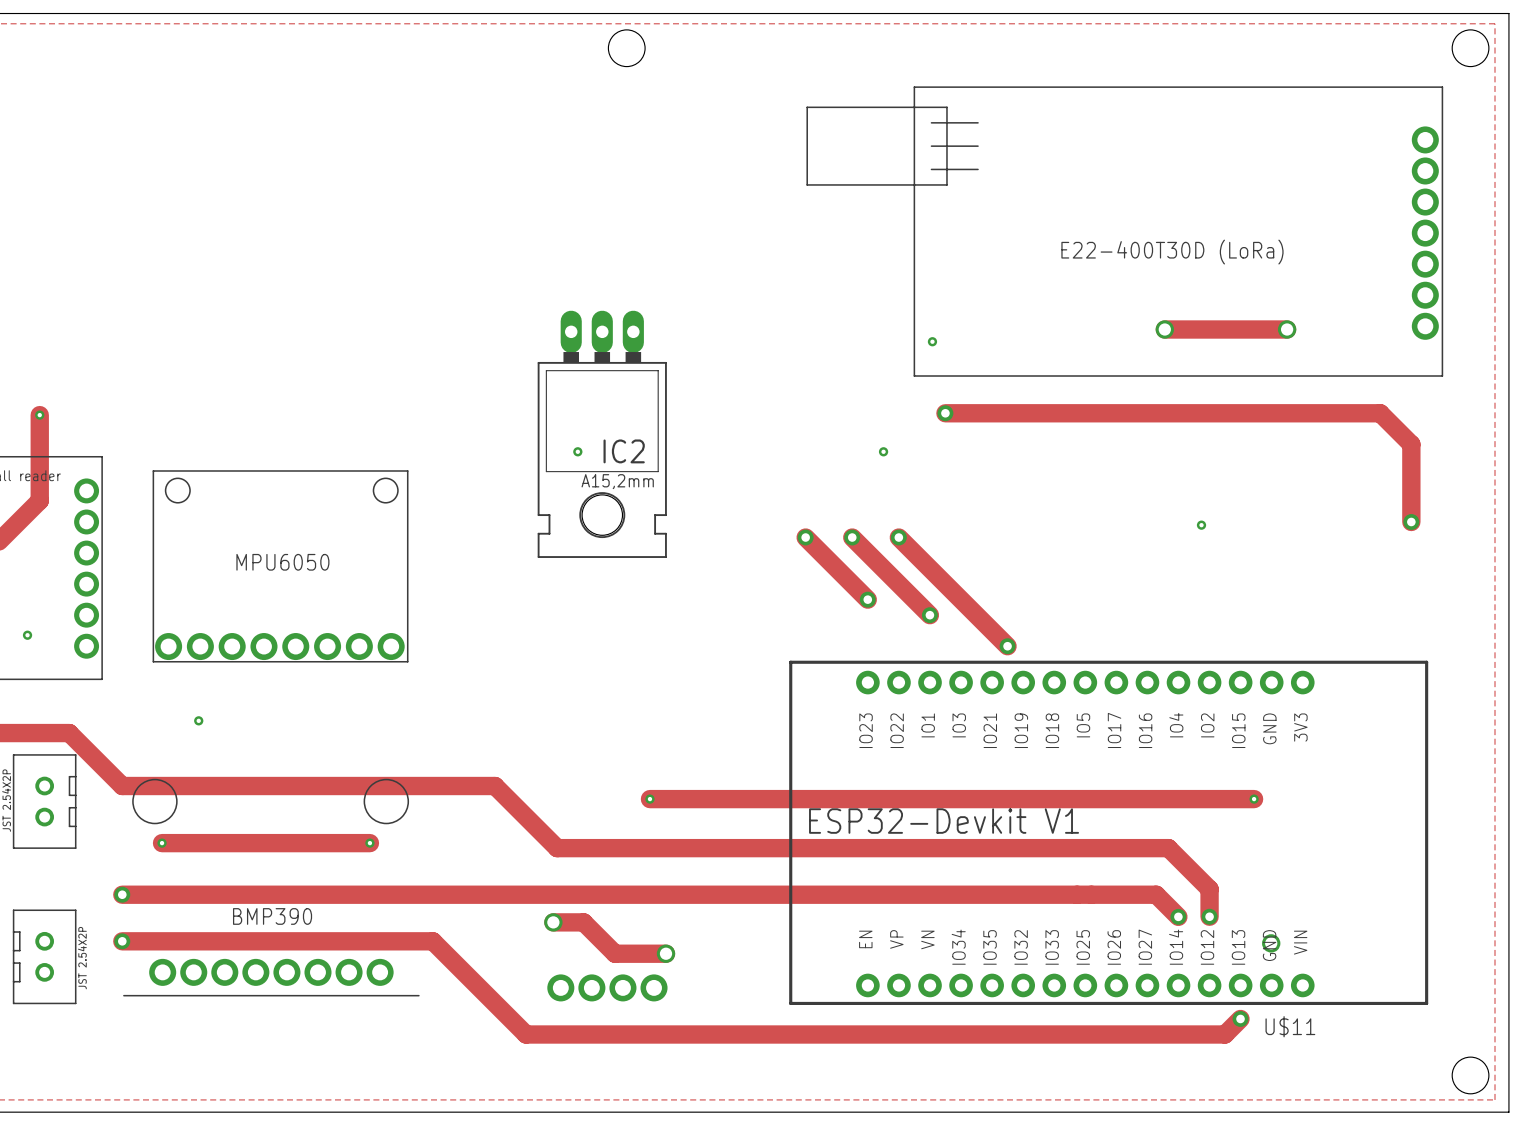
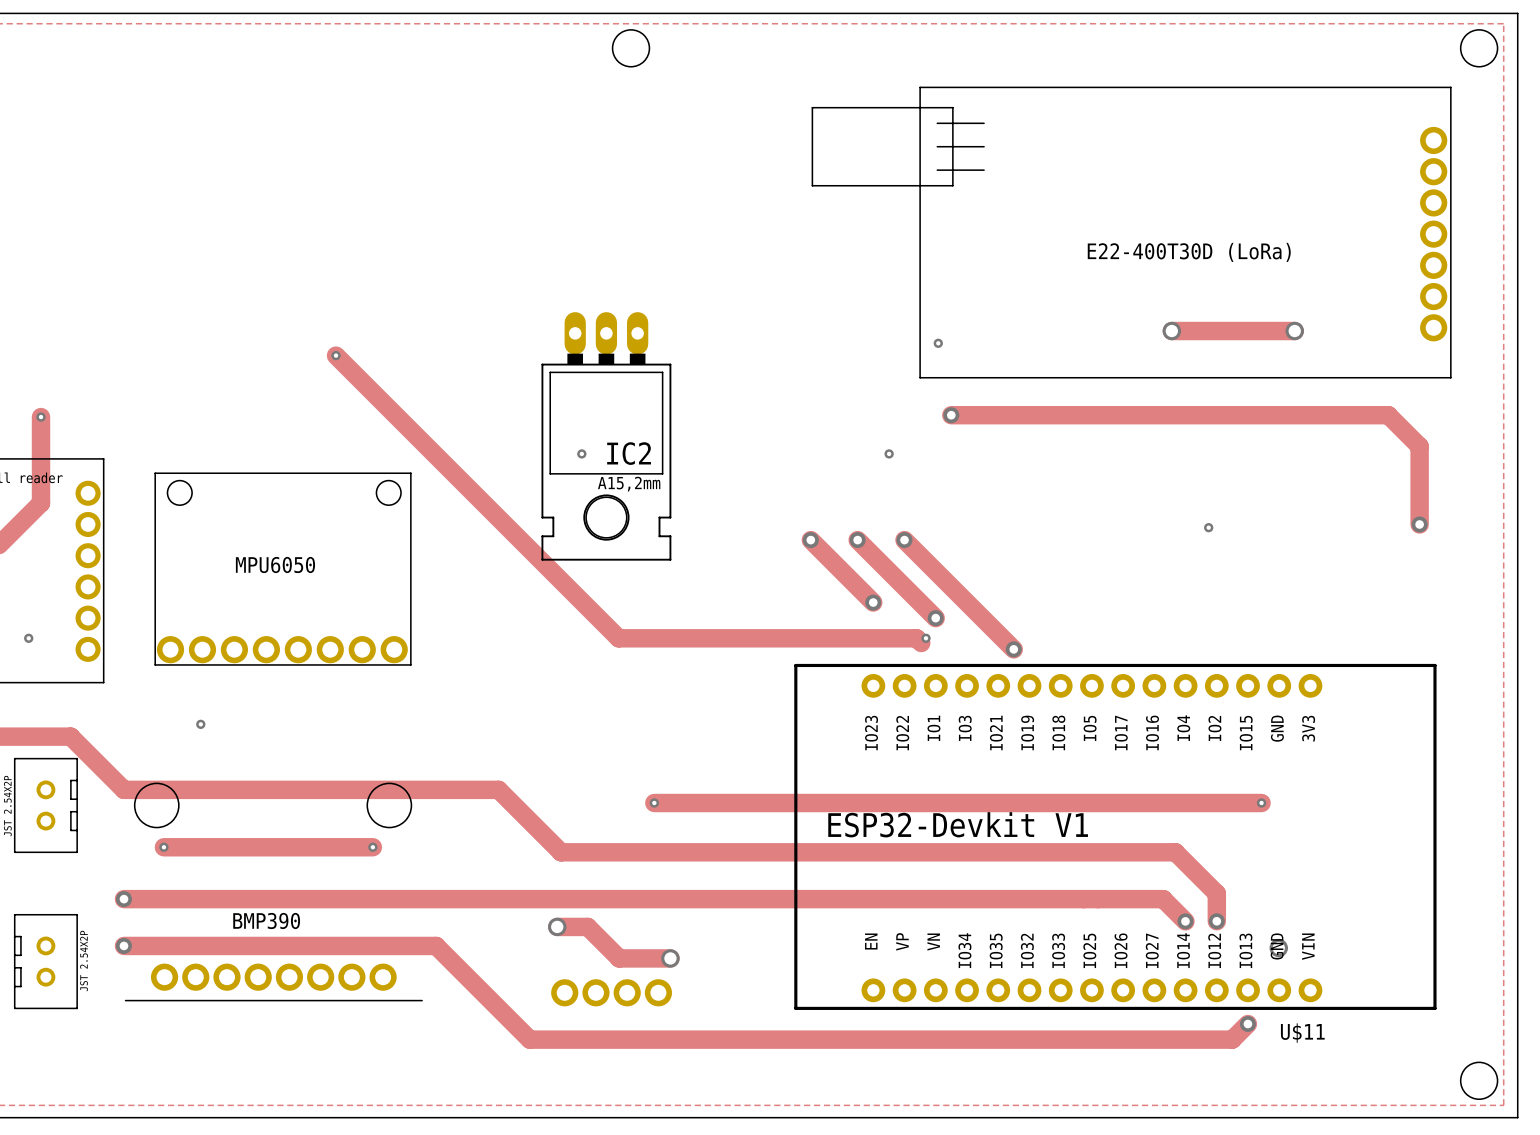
track: none -> (336, 355) (618, 638) (916, 638) (921, 643)
via: none -> (336, 355)
via: none -> (926, 638)

